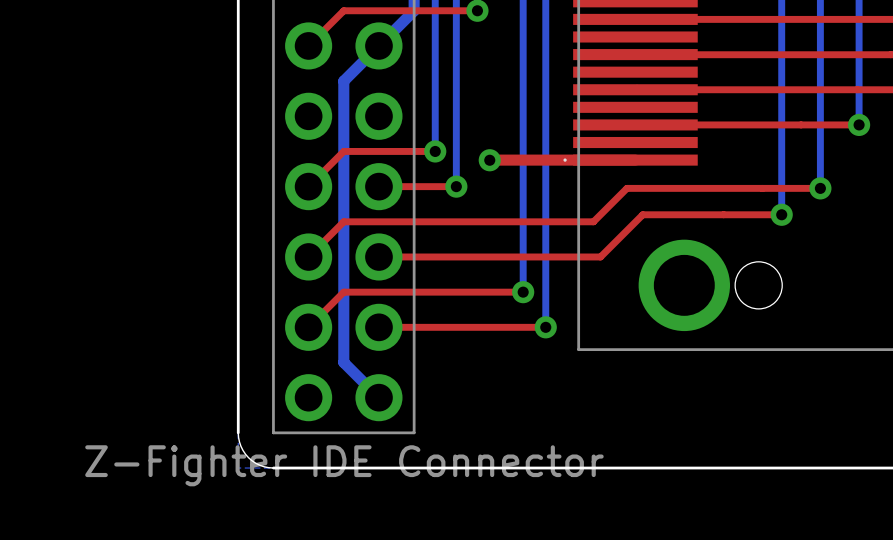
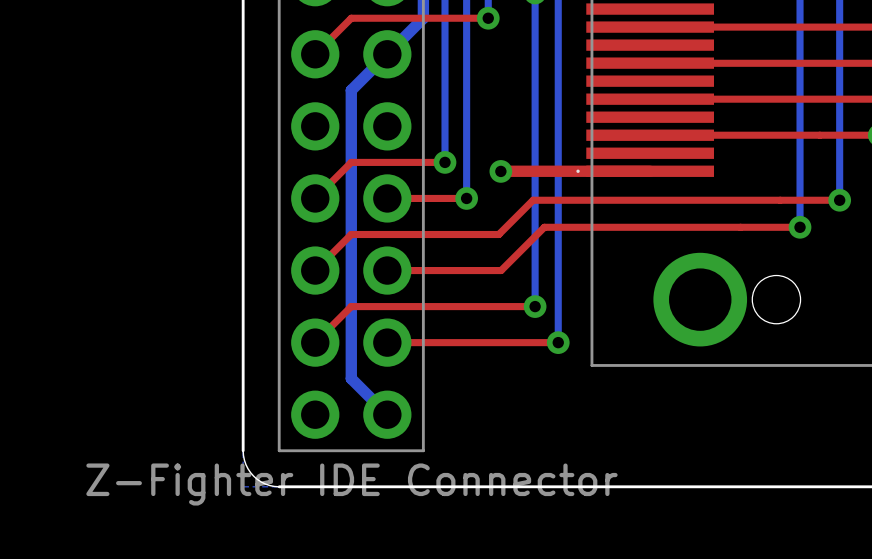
top track: (626, 188) (593, 221) (487, 221) -> (641, 200) (533, 200) (498, 234)
top track: (642, 214) (600, 256) (490, 256) -> (657, 227) (544, 227) (501, 270)

